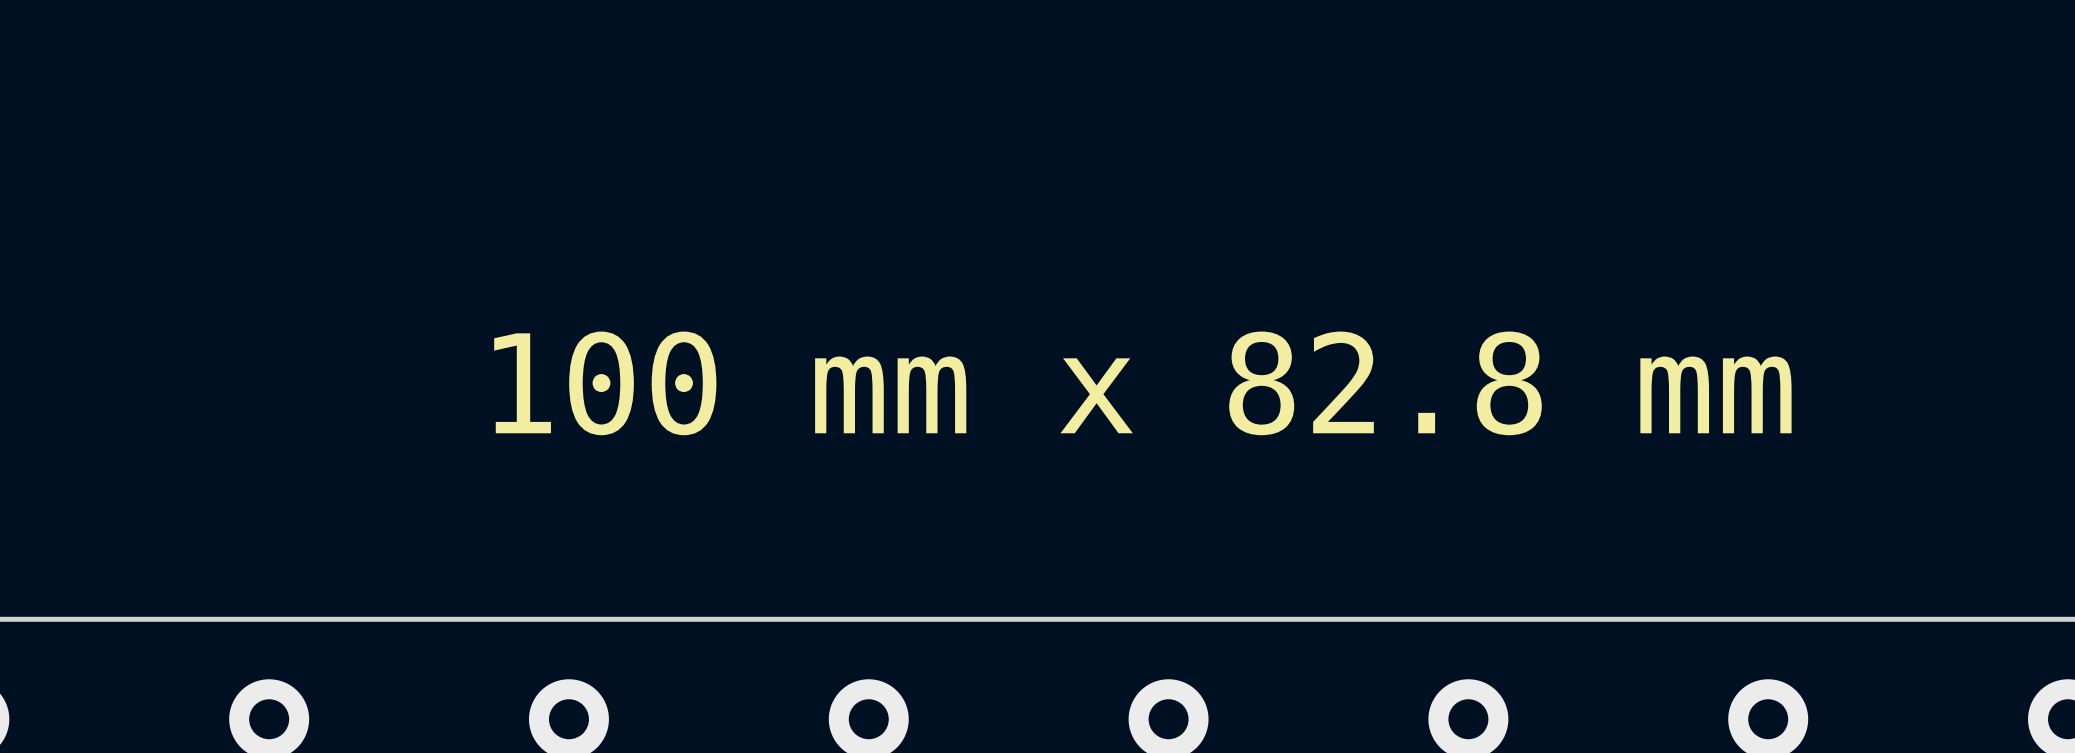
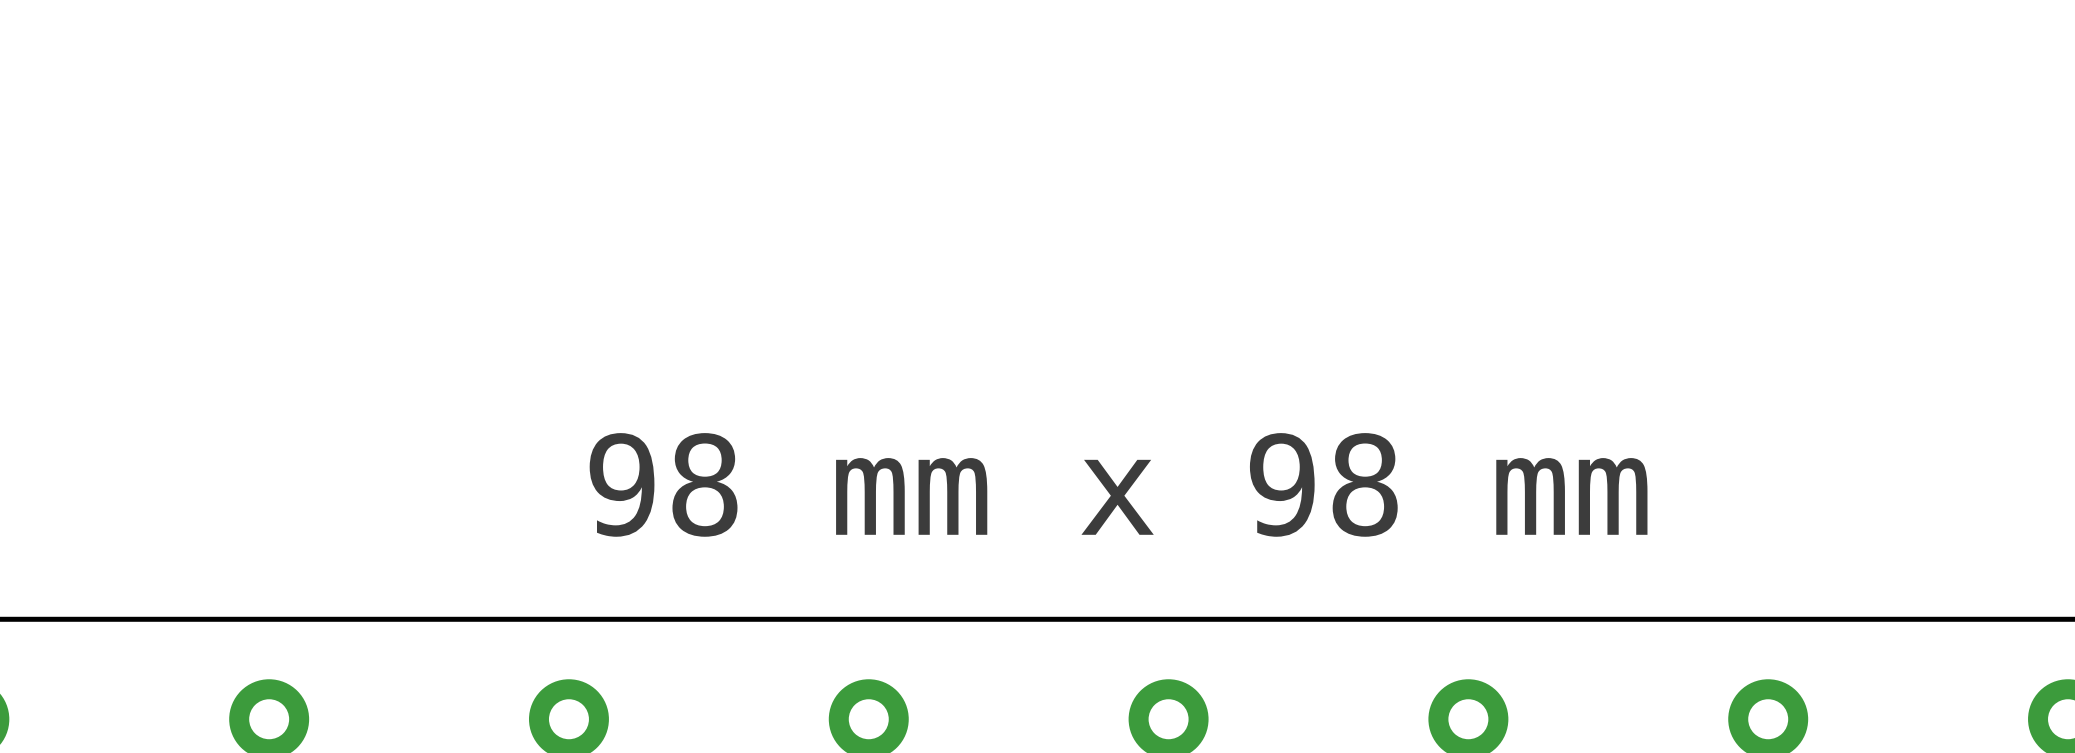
text: 100 mm x 82.8 mm (1142, 383) -> 98 mm x 98 mm (1118, 484)

